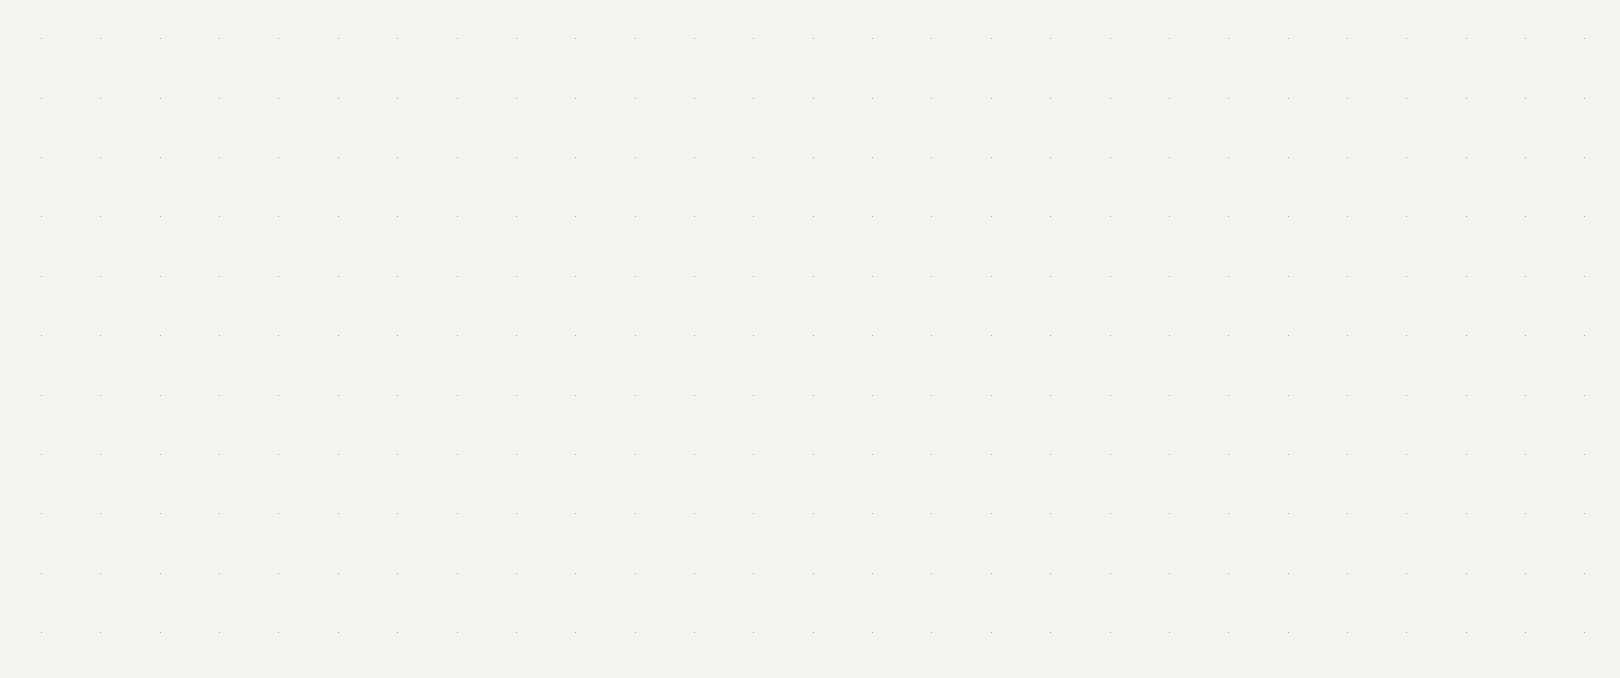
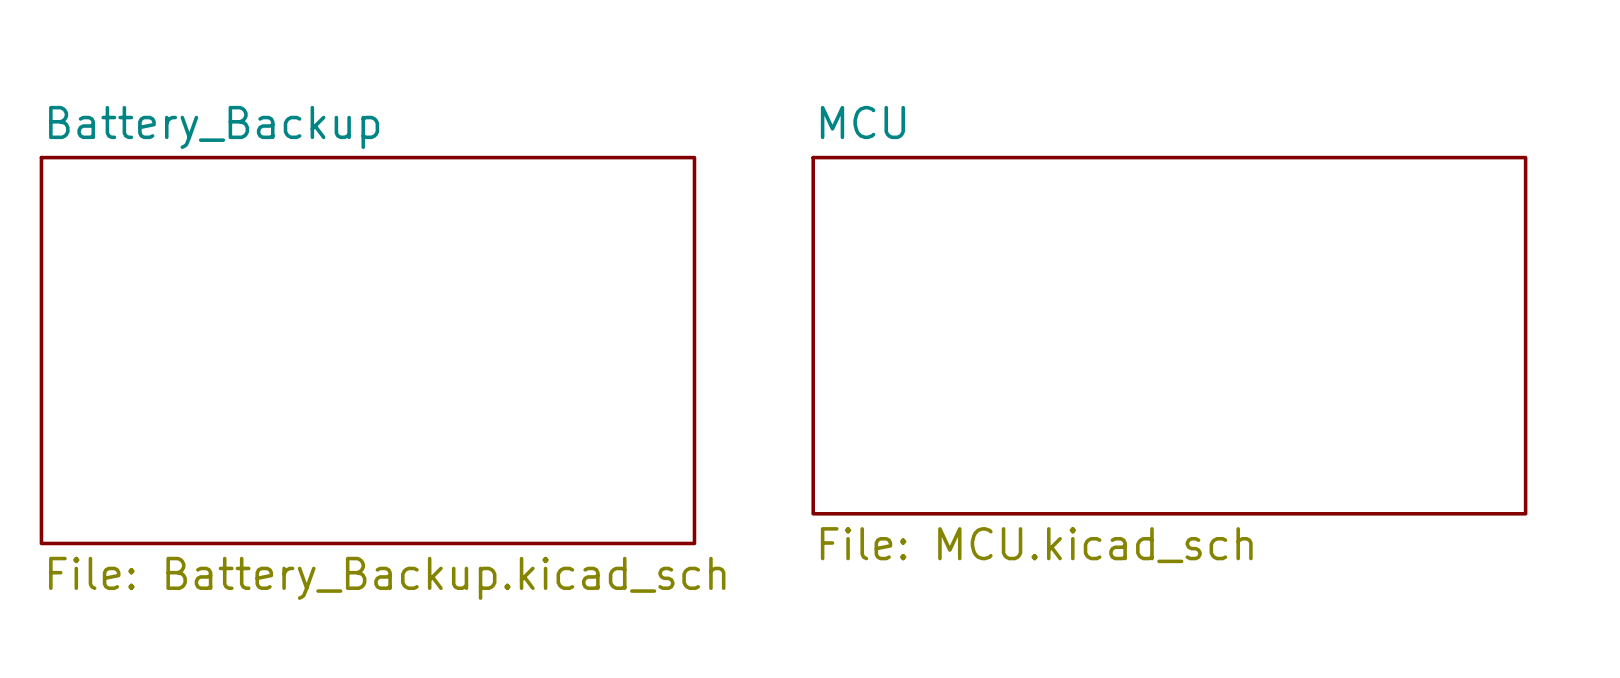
sheet MCU: none -> File: MCU.kicad_sch (1169, 335)
sheet Battery_Backup: none -> File: Battery_Backup.kicad_sch (367, 350)

